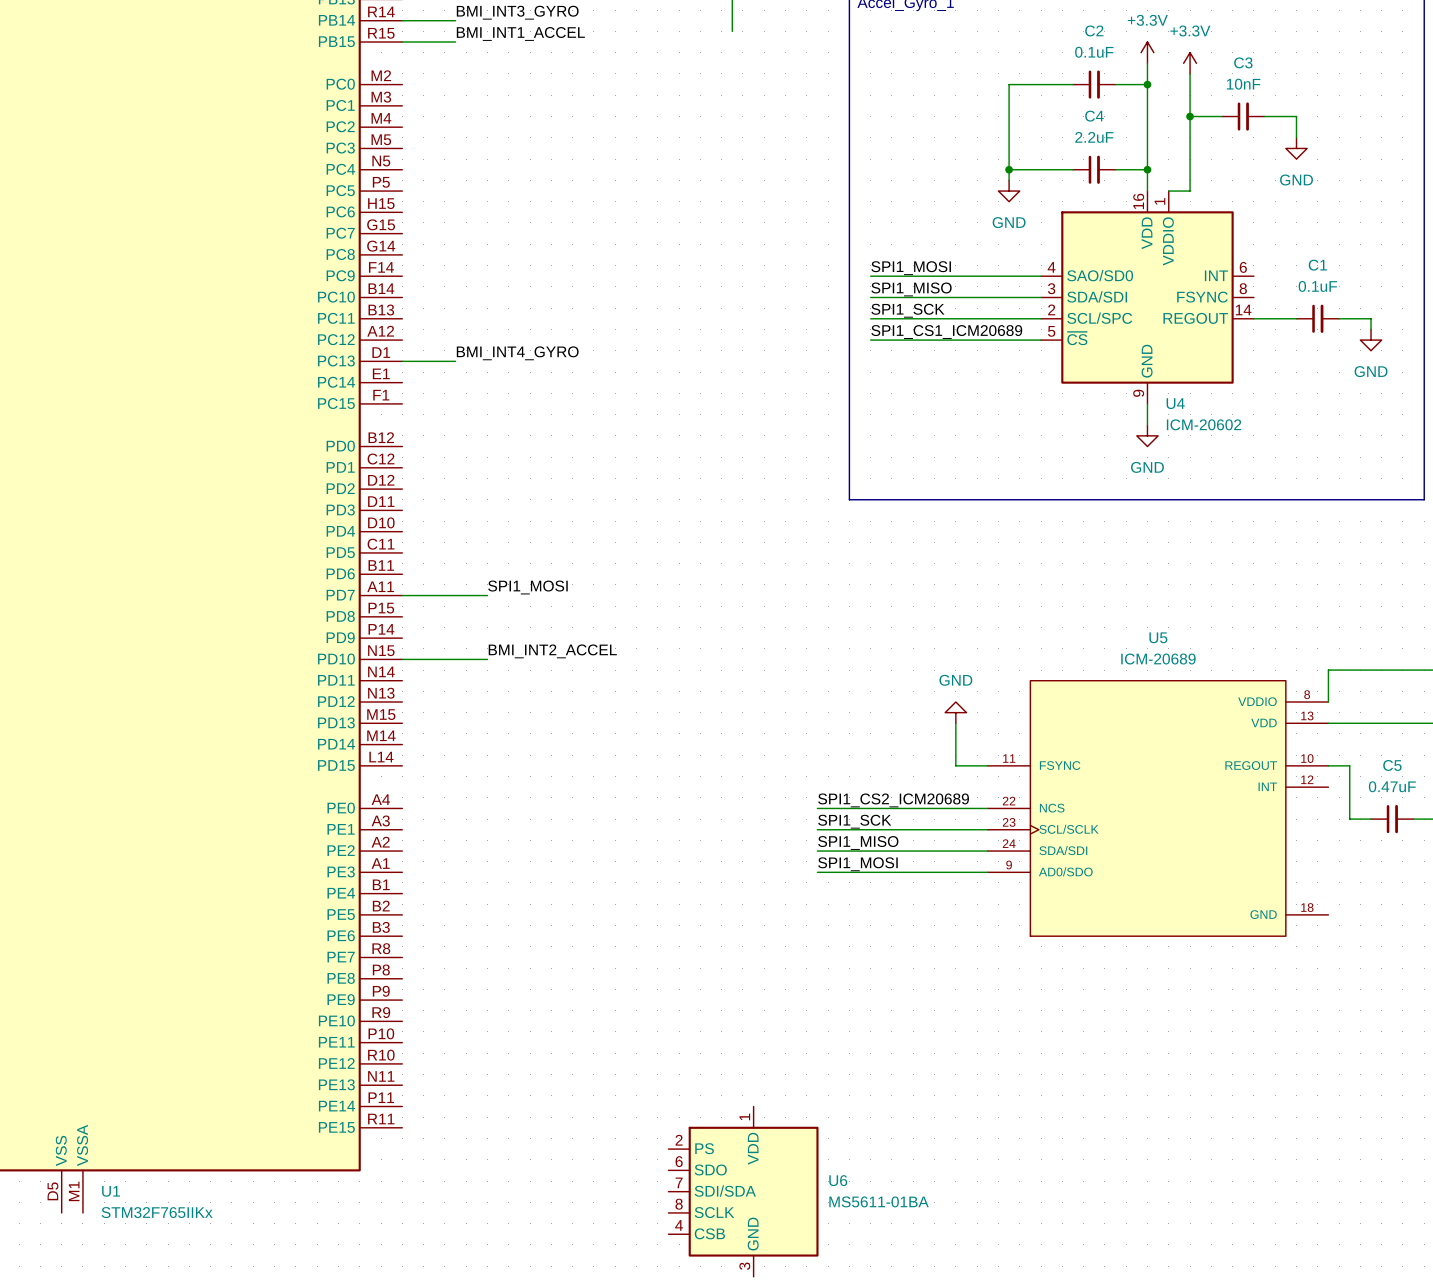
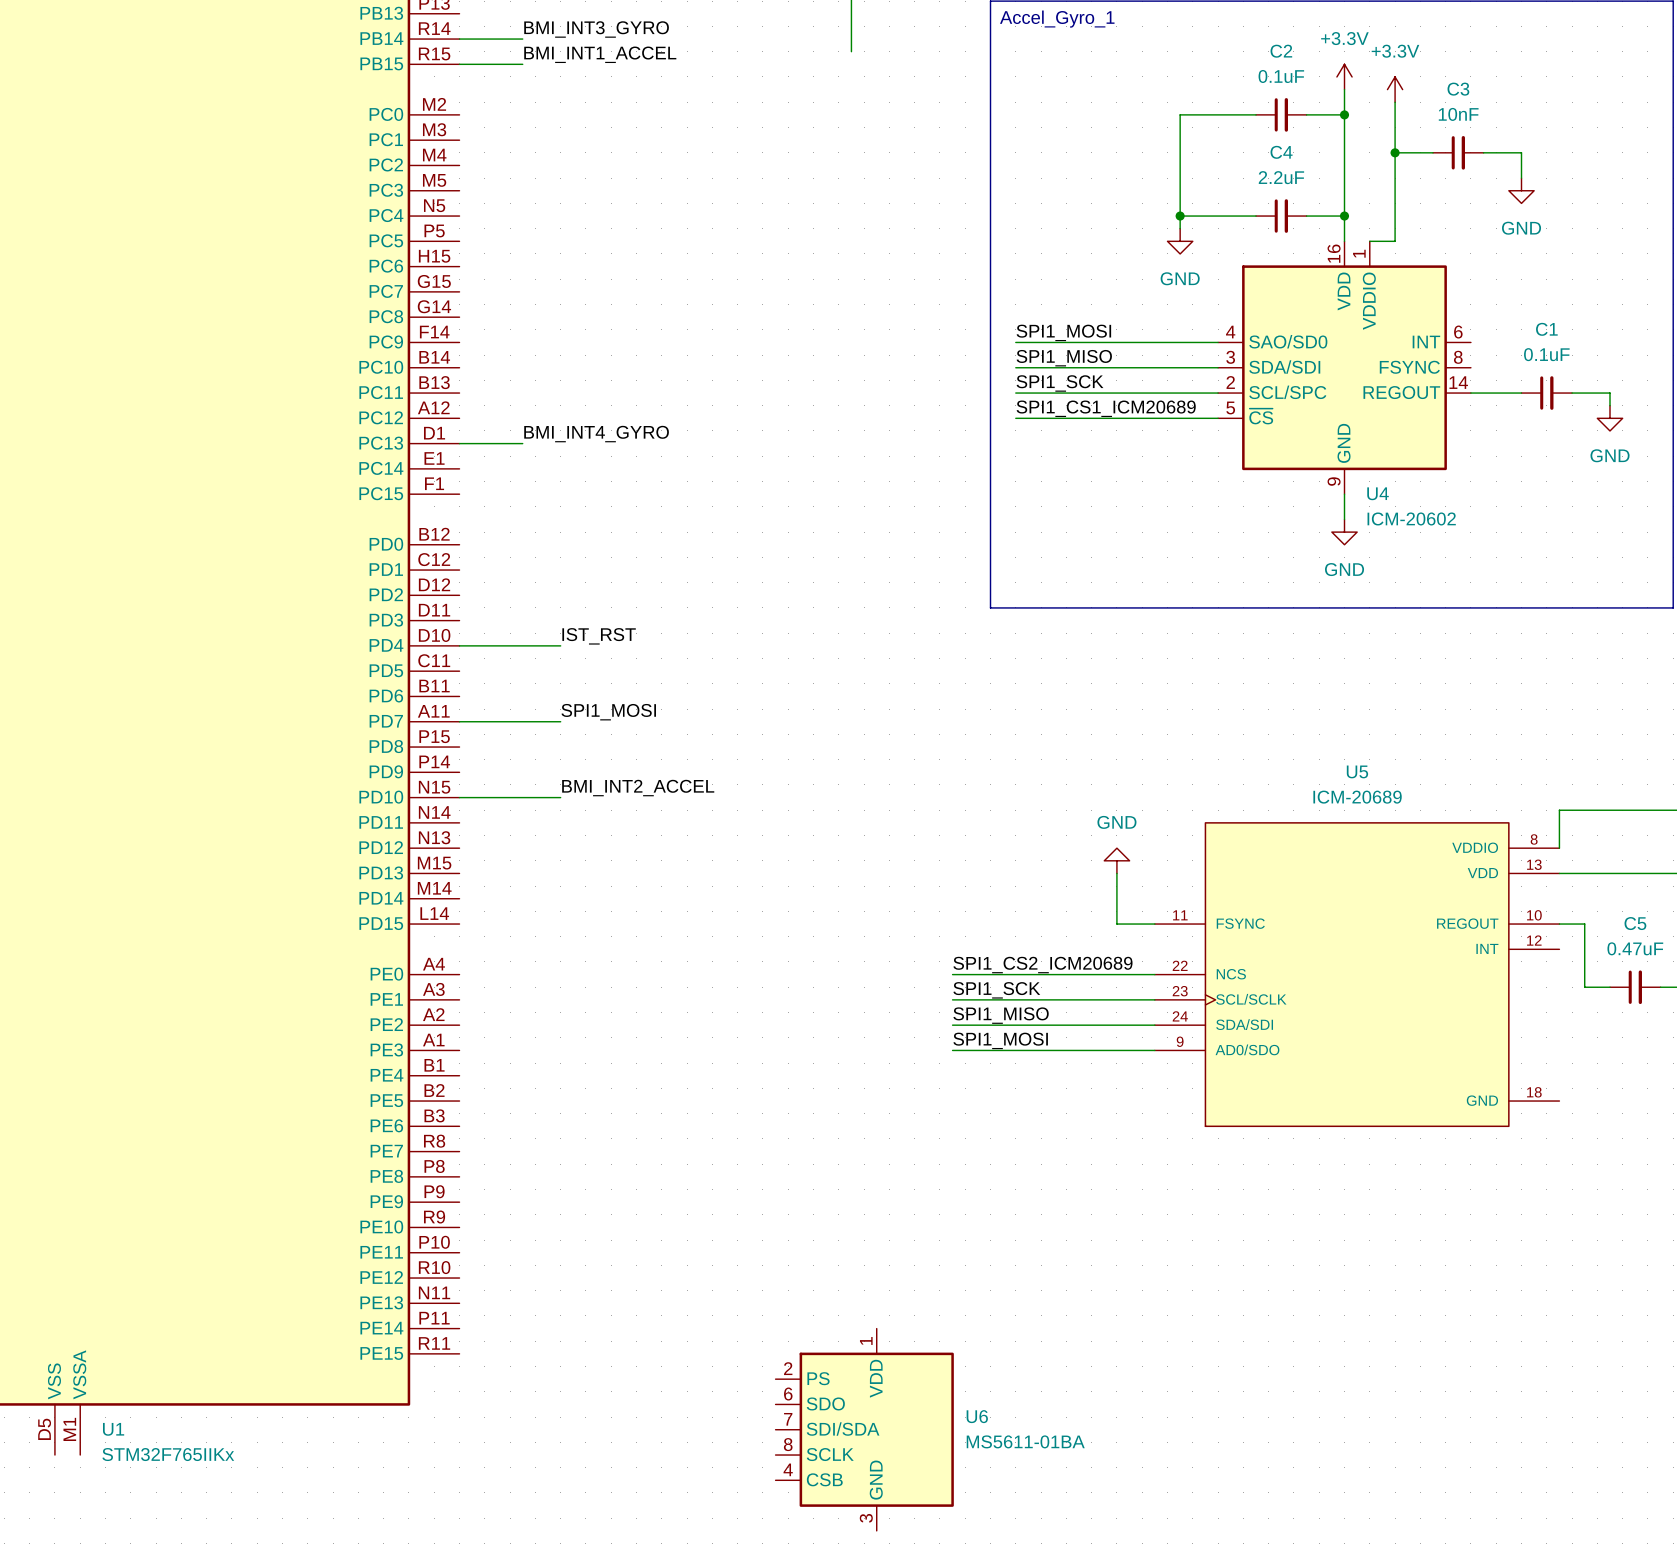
label: none -> IST_RST (599, 636)
wire: none -> (459, 645) (560, 645)

